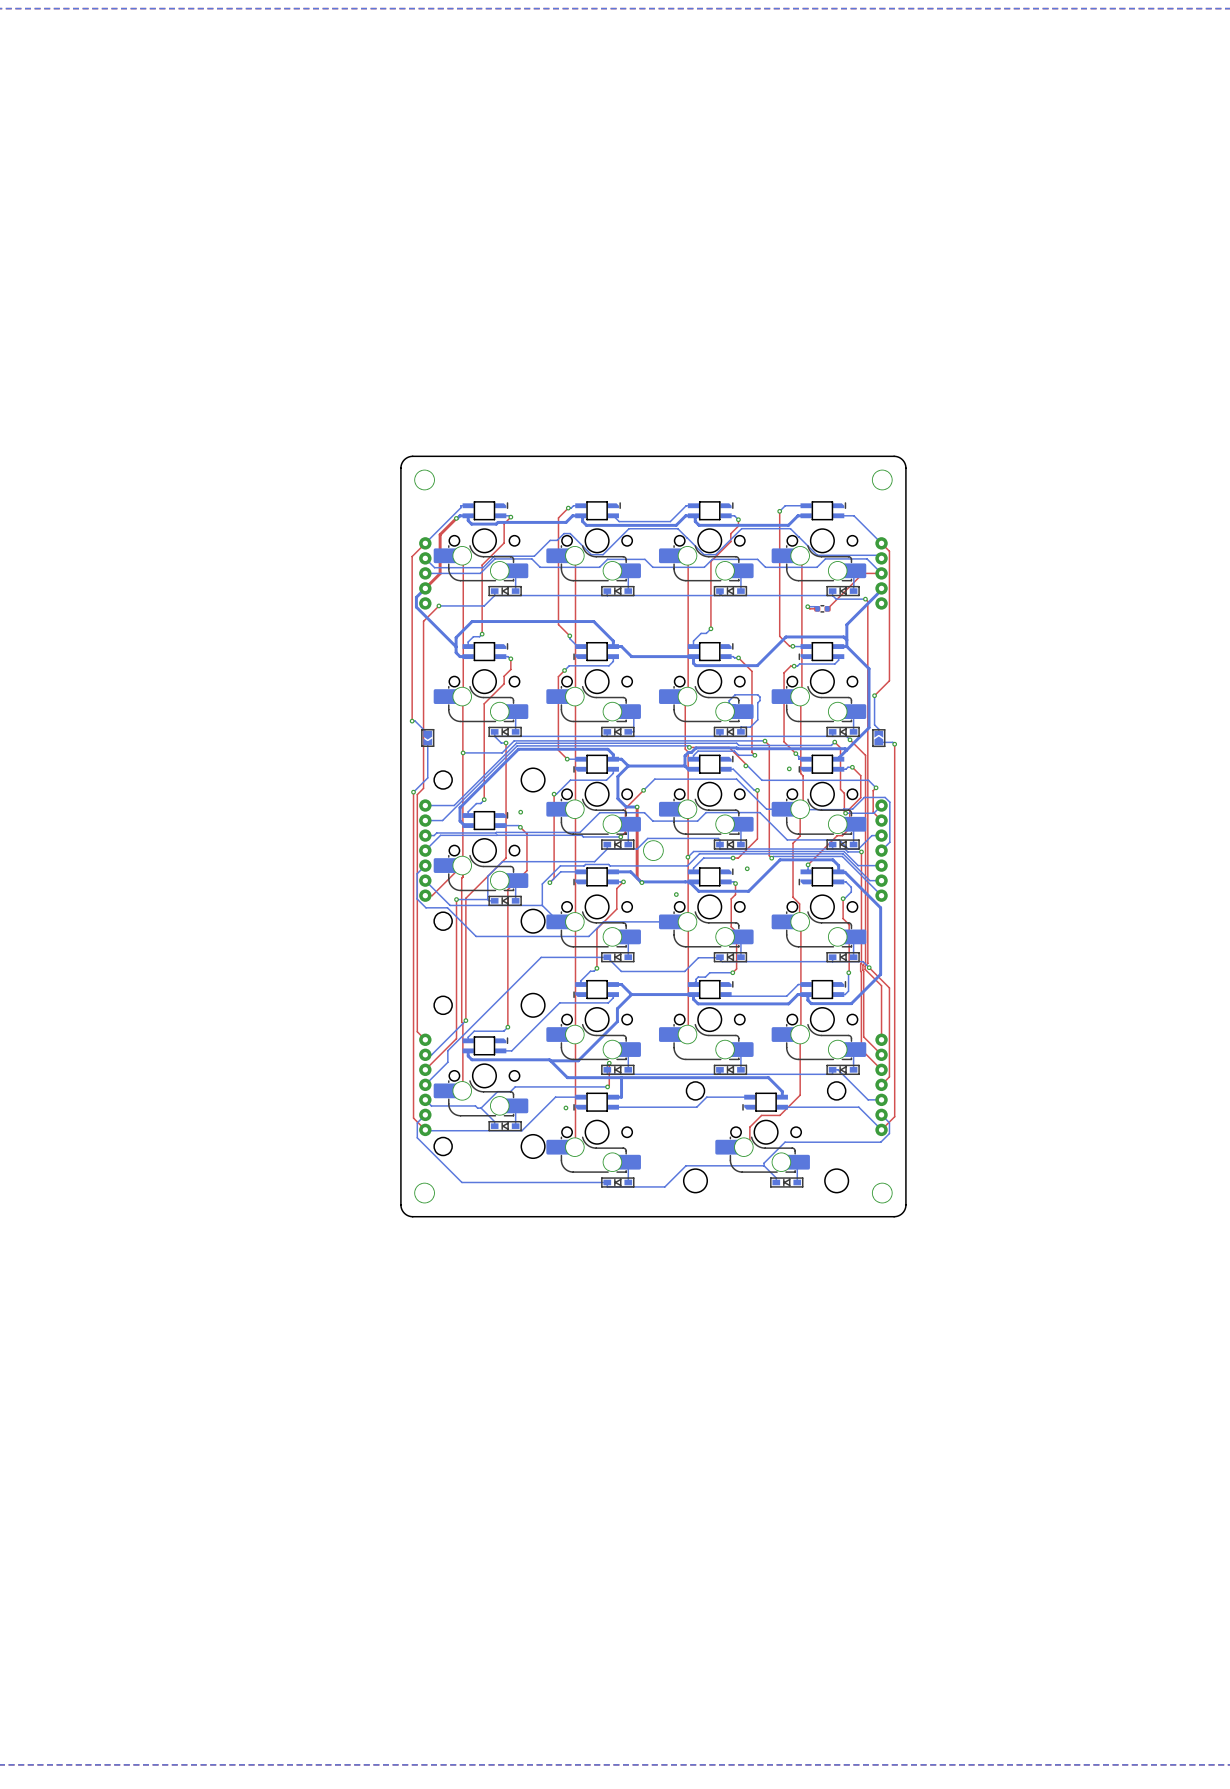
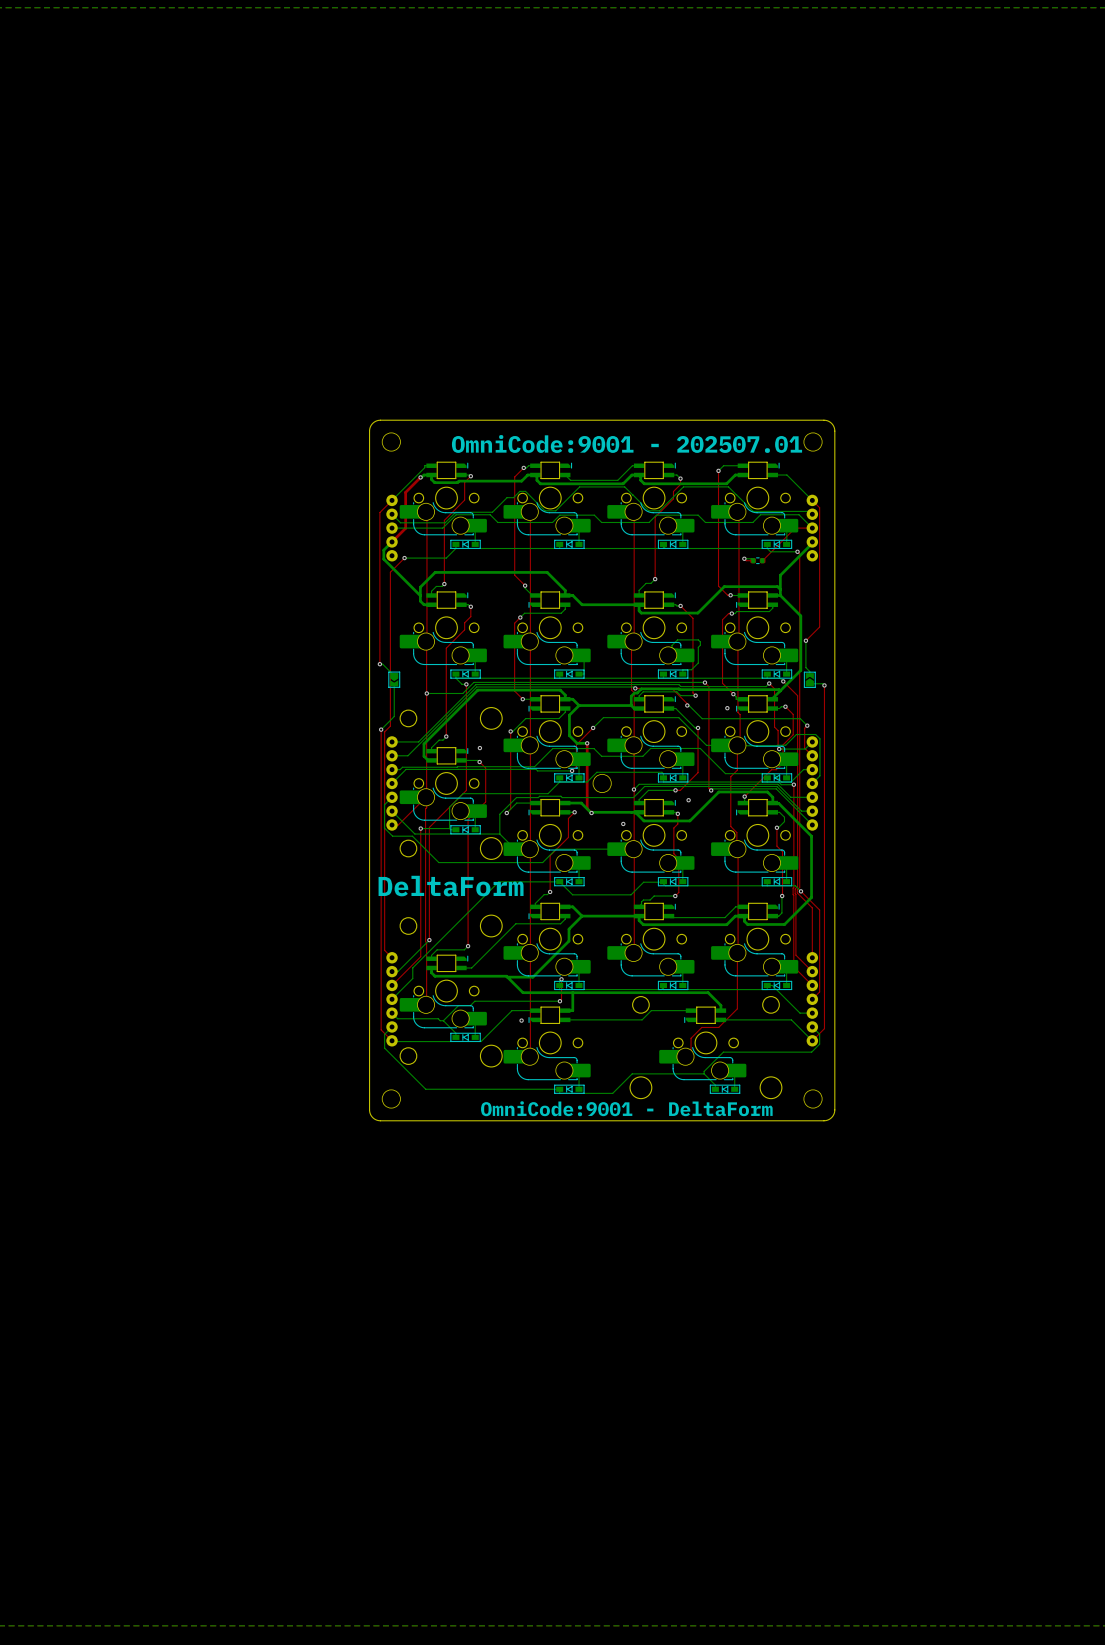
text: none -> OmniCode:9001 - 202507.01 (627, 443)
text: none -> DeltaForm (451, 886)
text: none -> OmniCode:9001 - DeltaForm (626, 1108)

